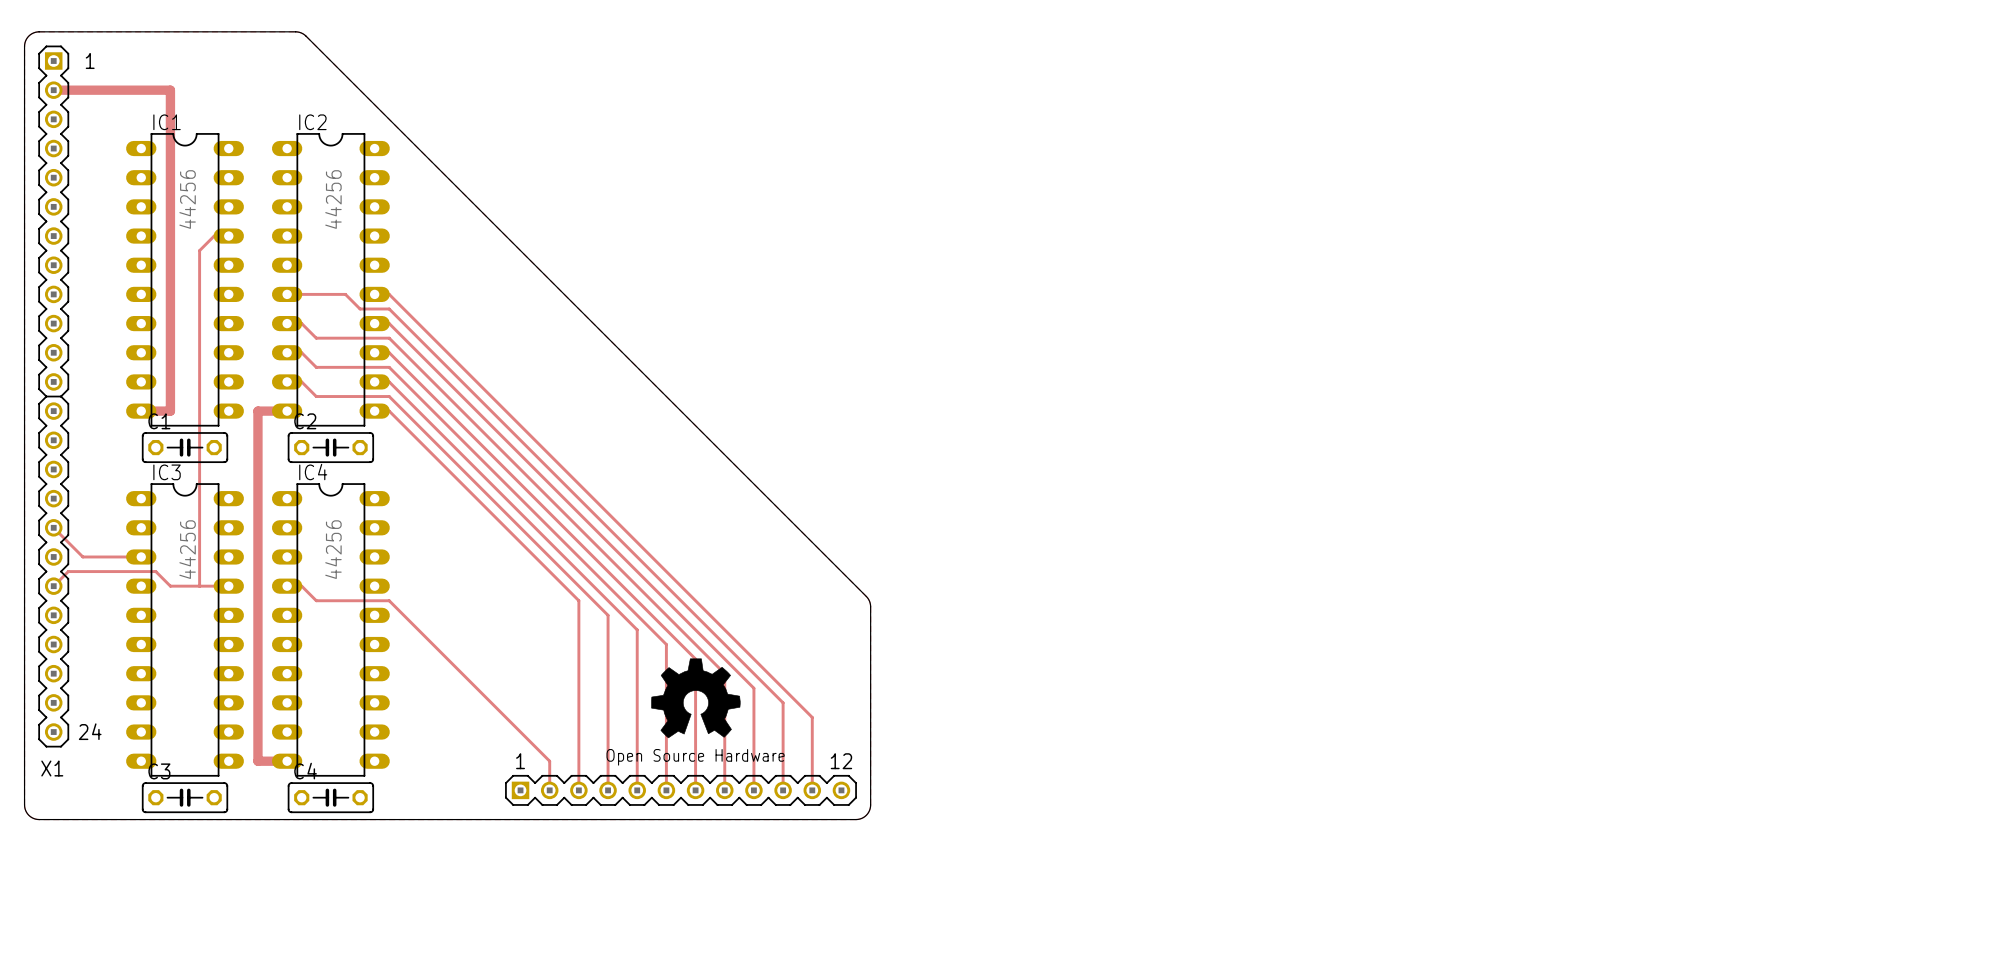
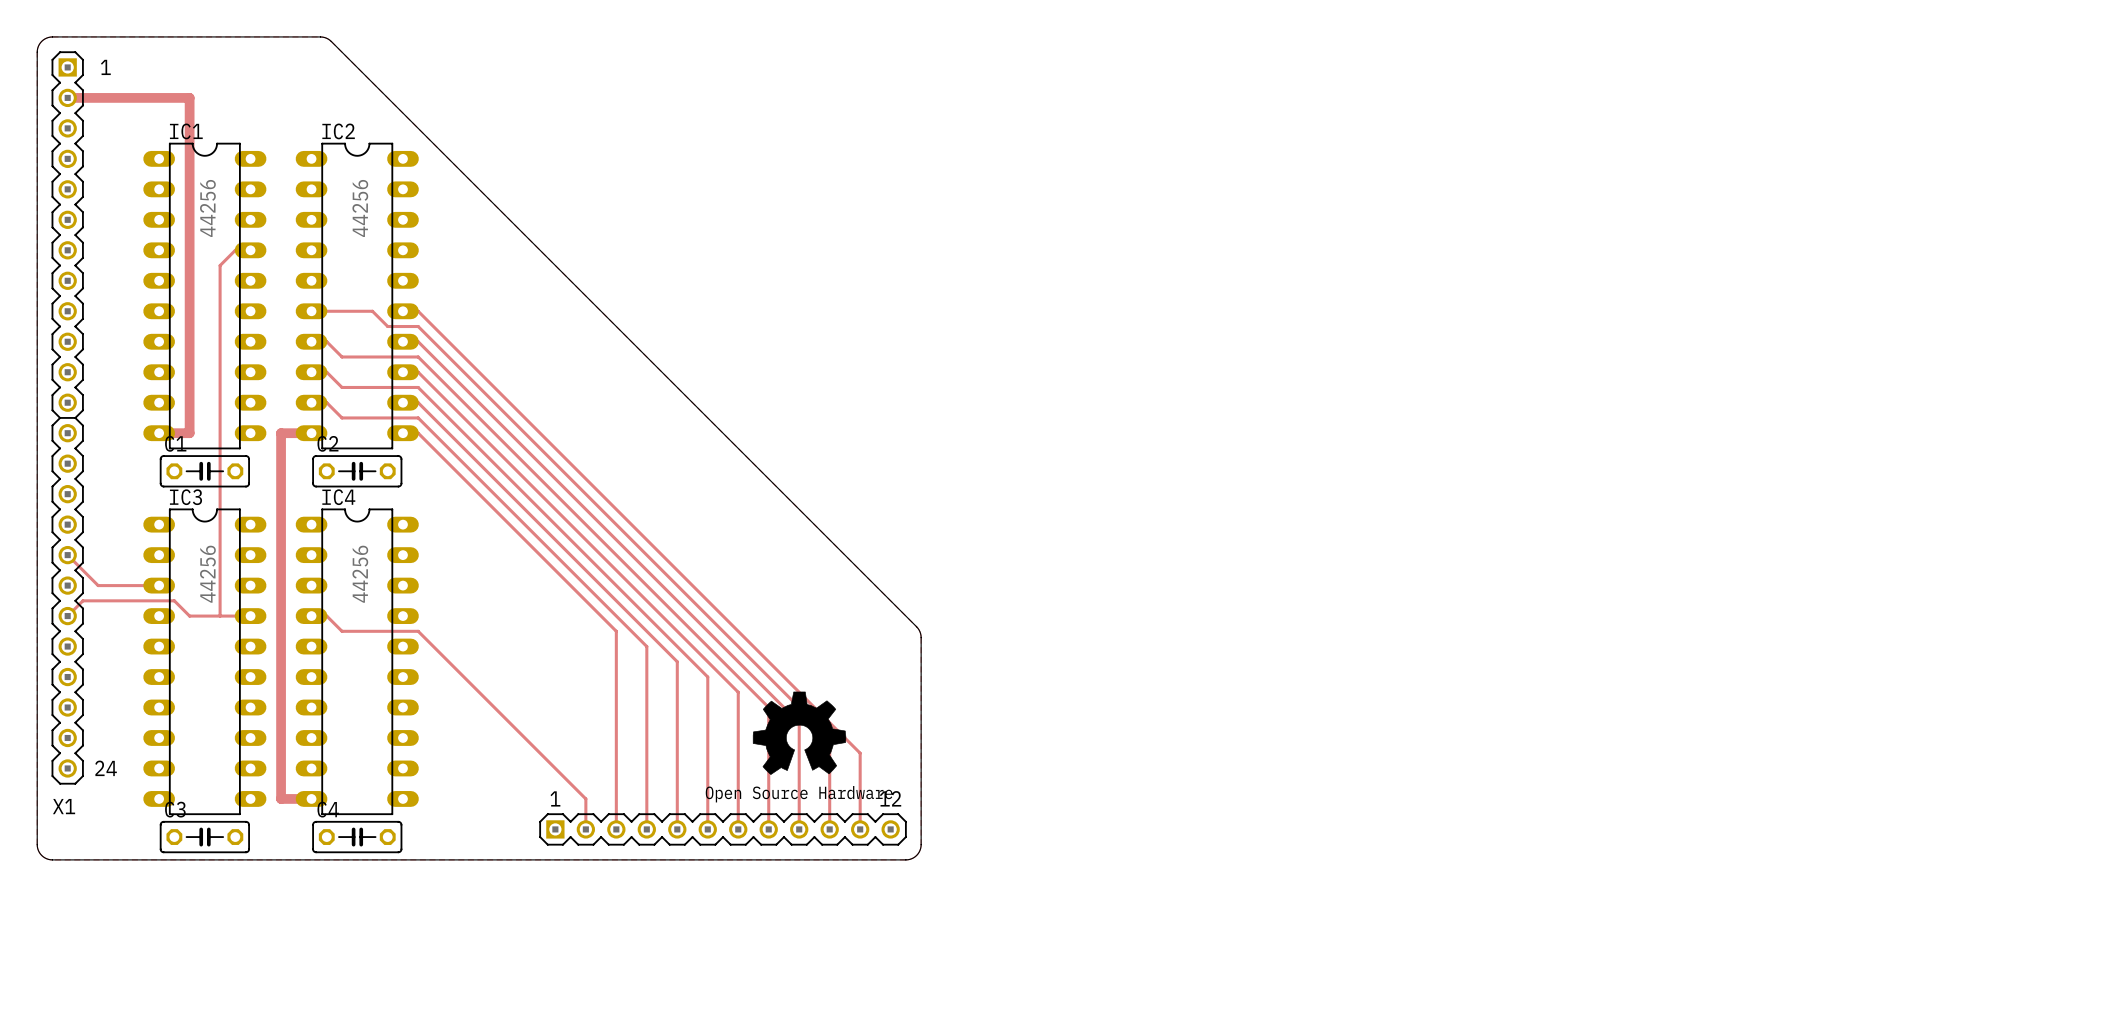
drawing position: (695, 698) -> (799, 733)

